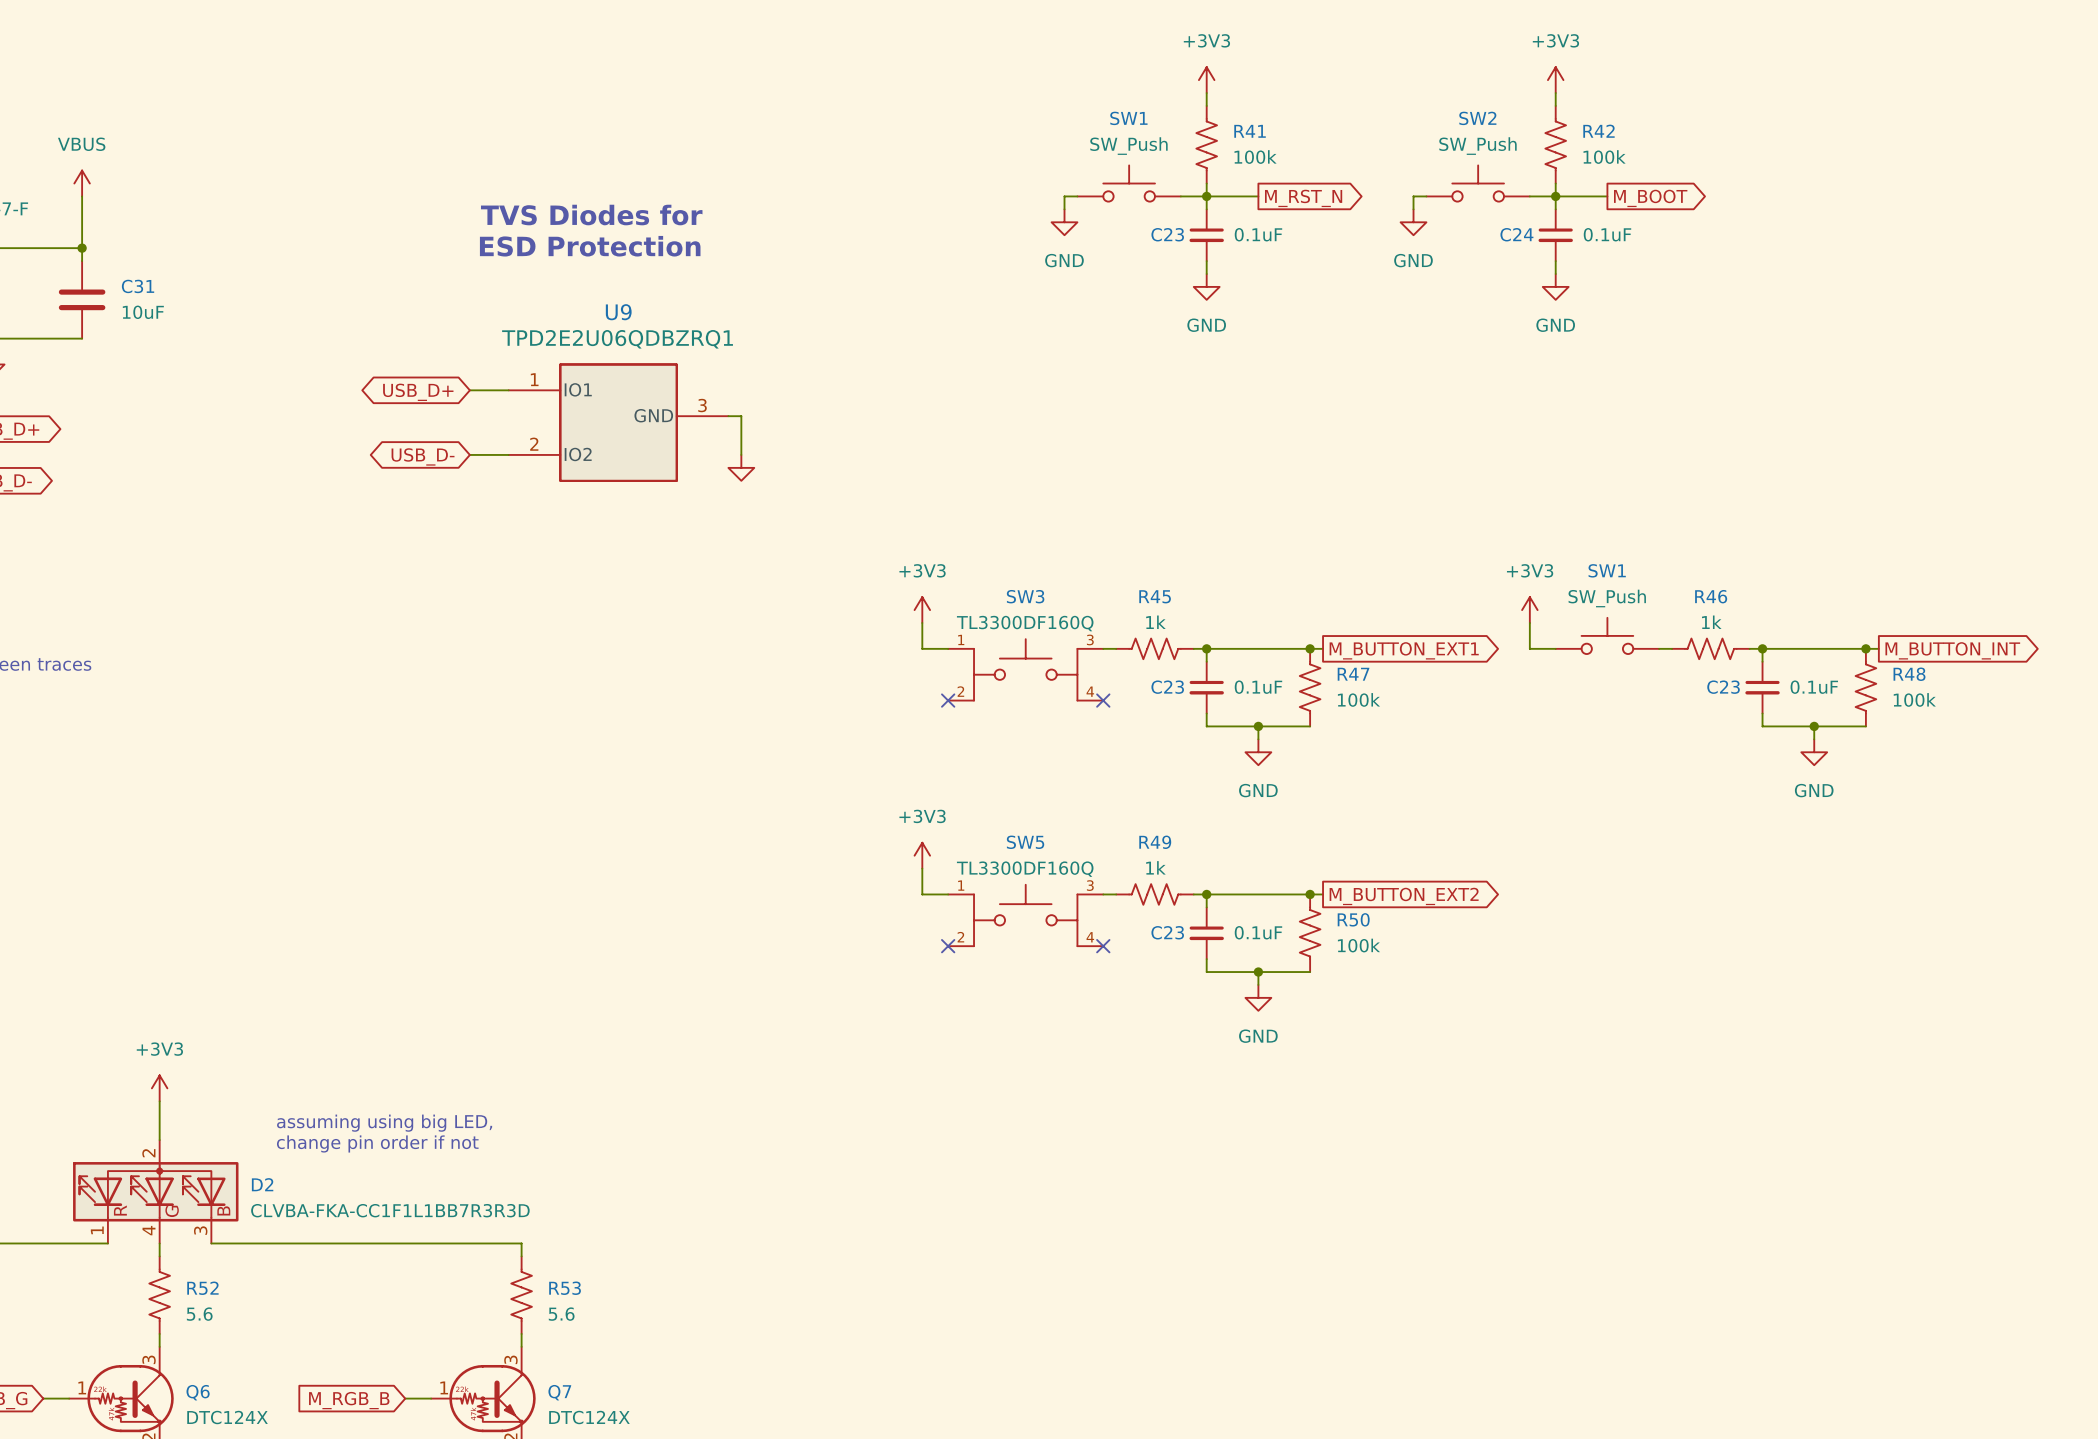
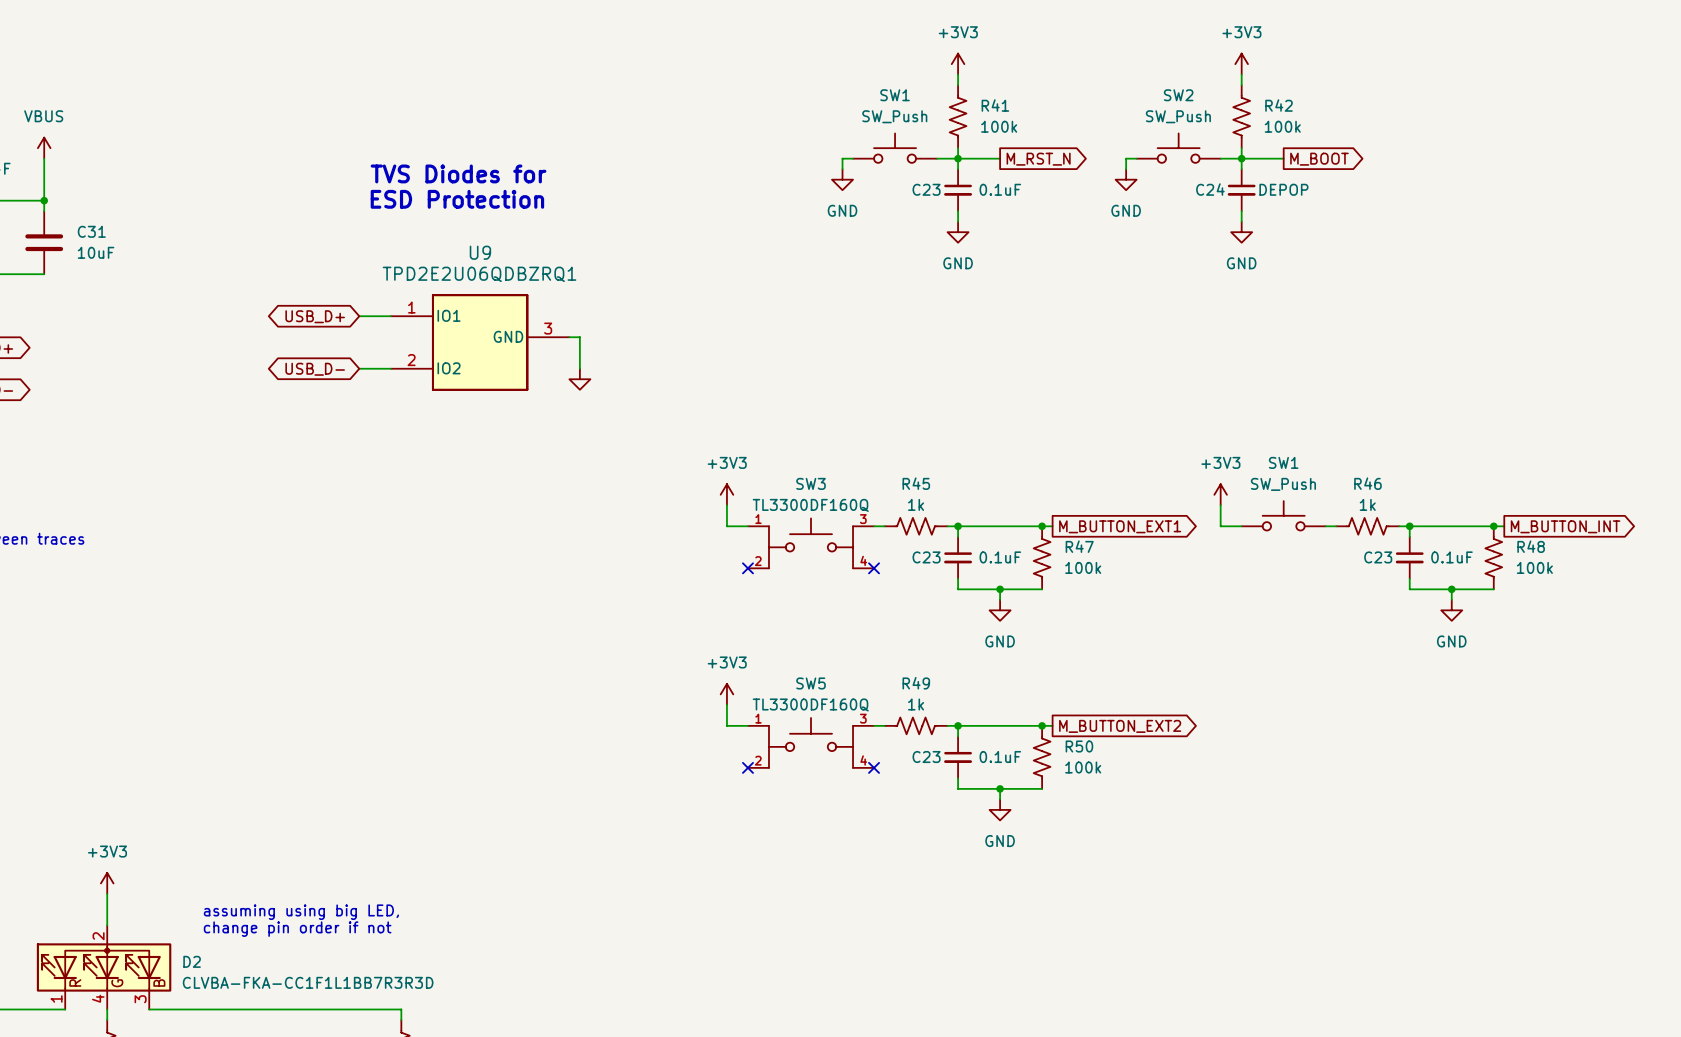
C24 value: 0.1uF (1607, 234) -> DEPOP (1283, 189)

